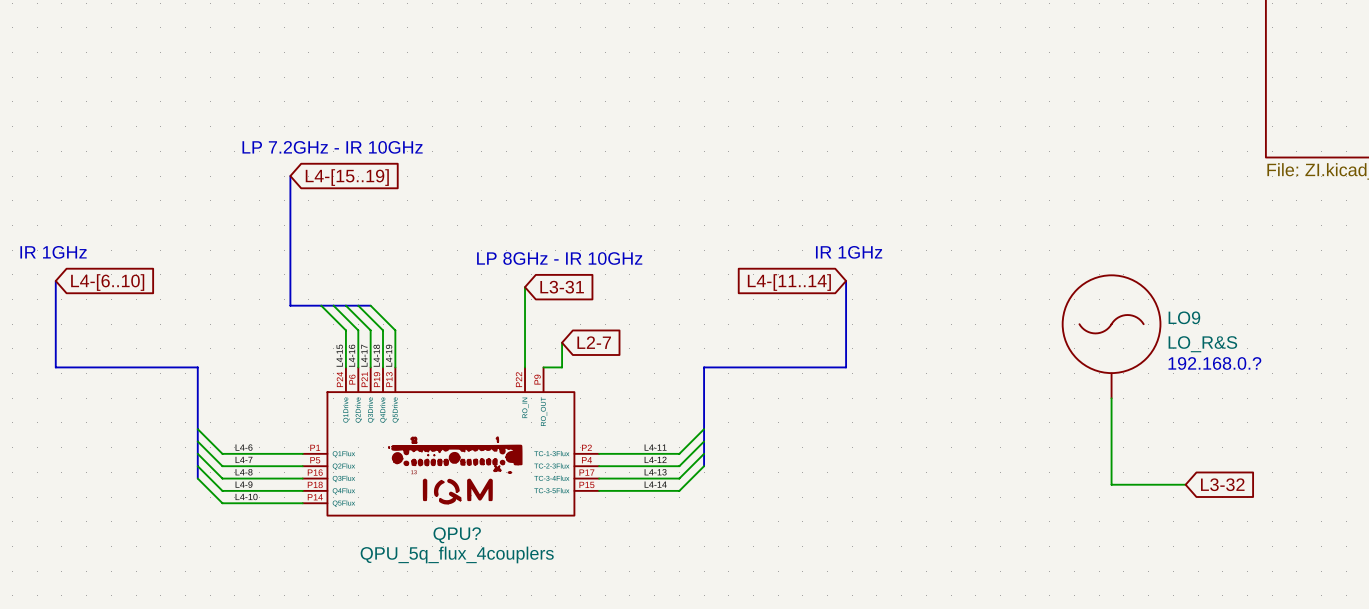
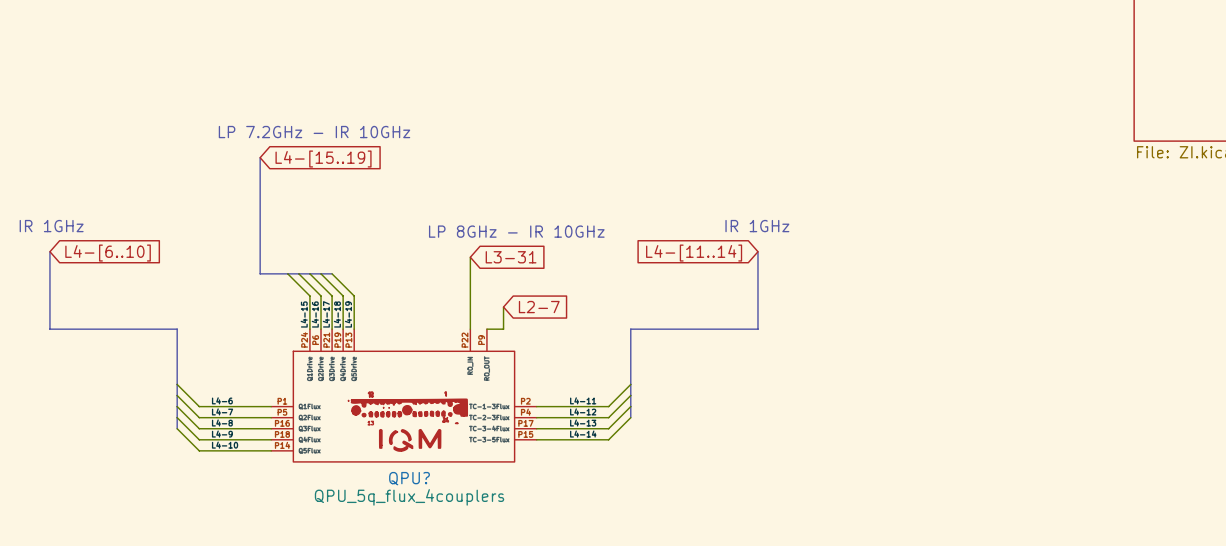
LO9: LO_R&S (1111, 336) -> none
text: 192.168.0.? (1214, 363) -> none
wire: (1111, 398) (1111, 484) (1185, 484) -> none
global label: L3-32 (1222, 484) -> none

